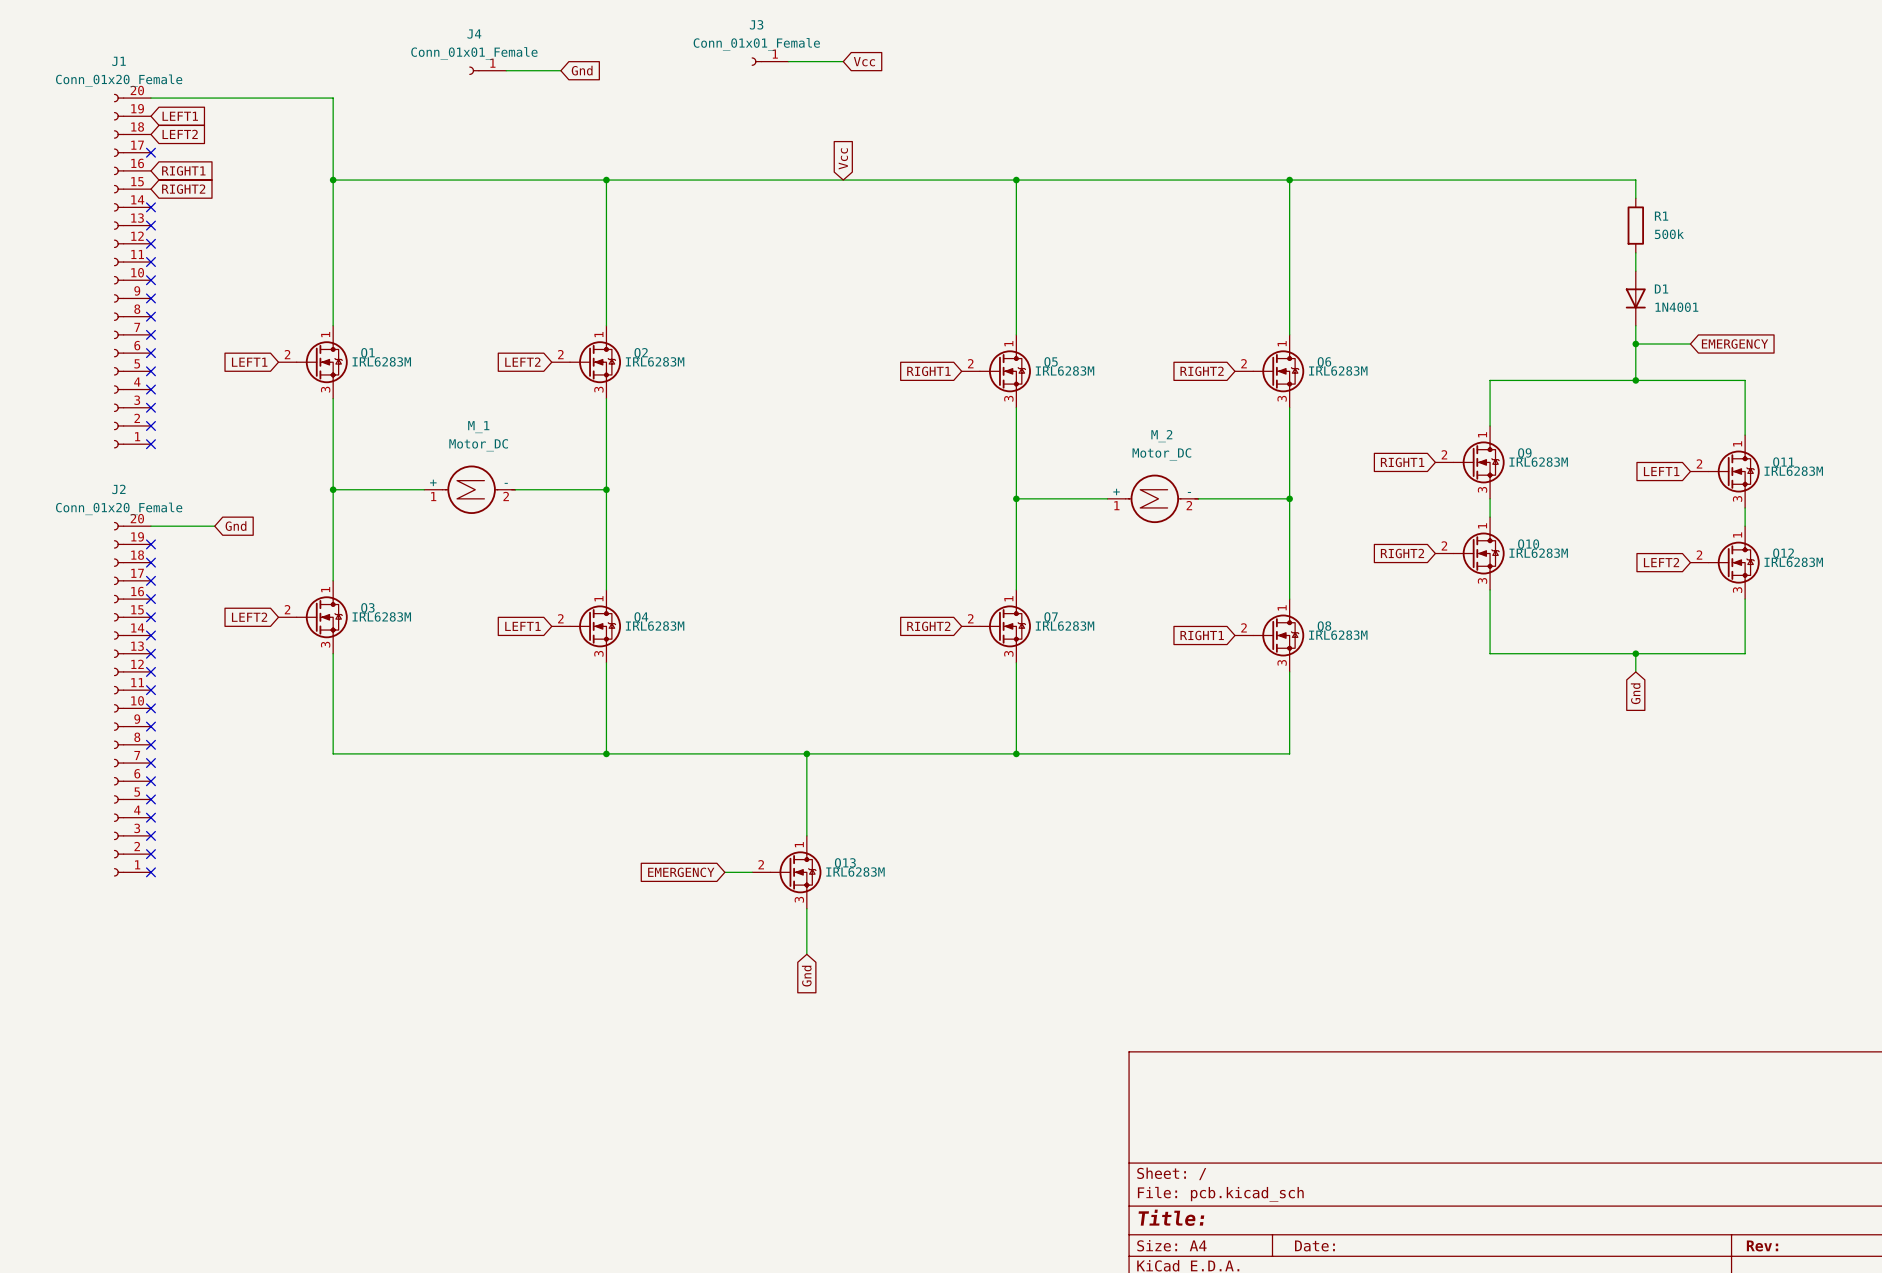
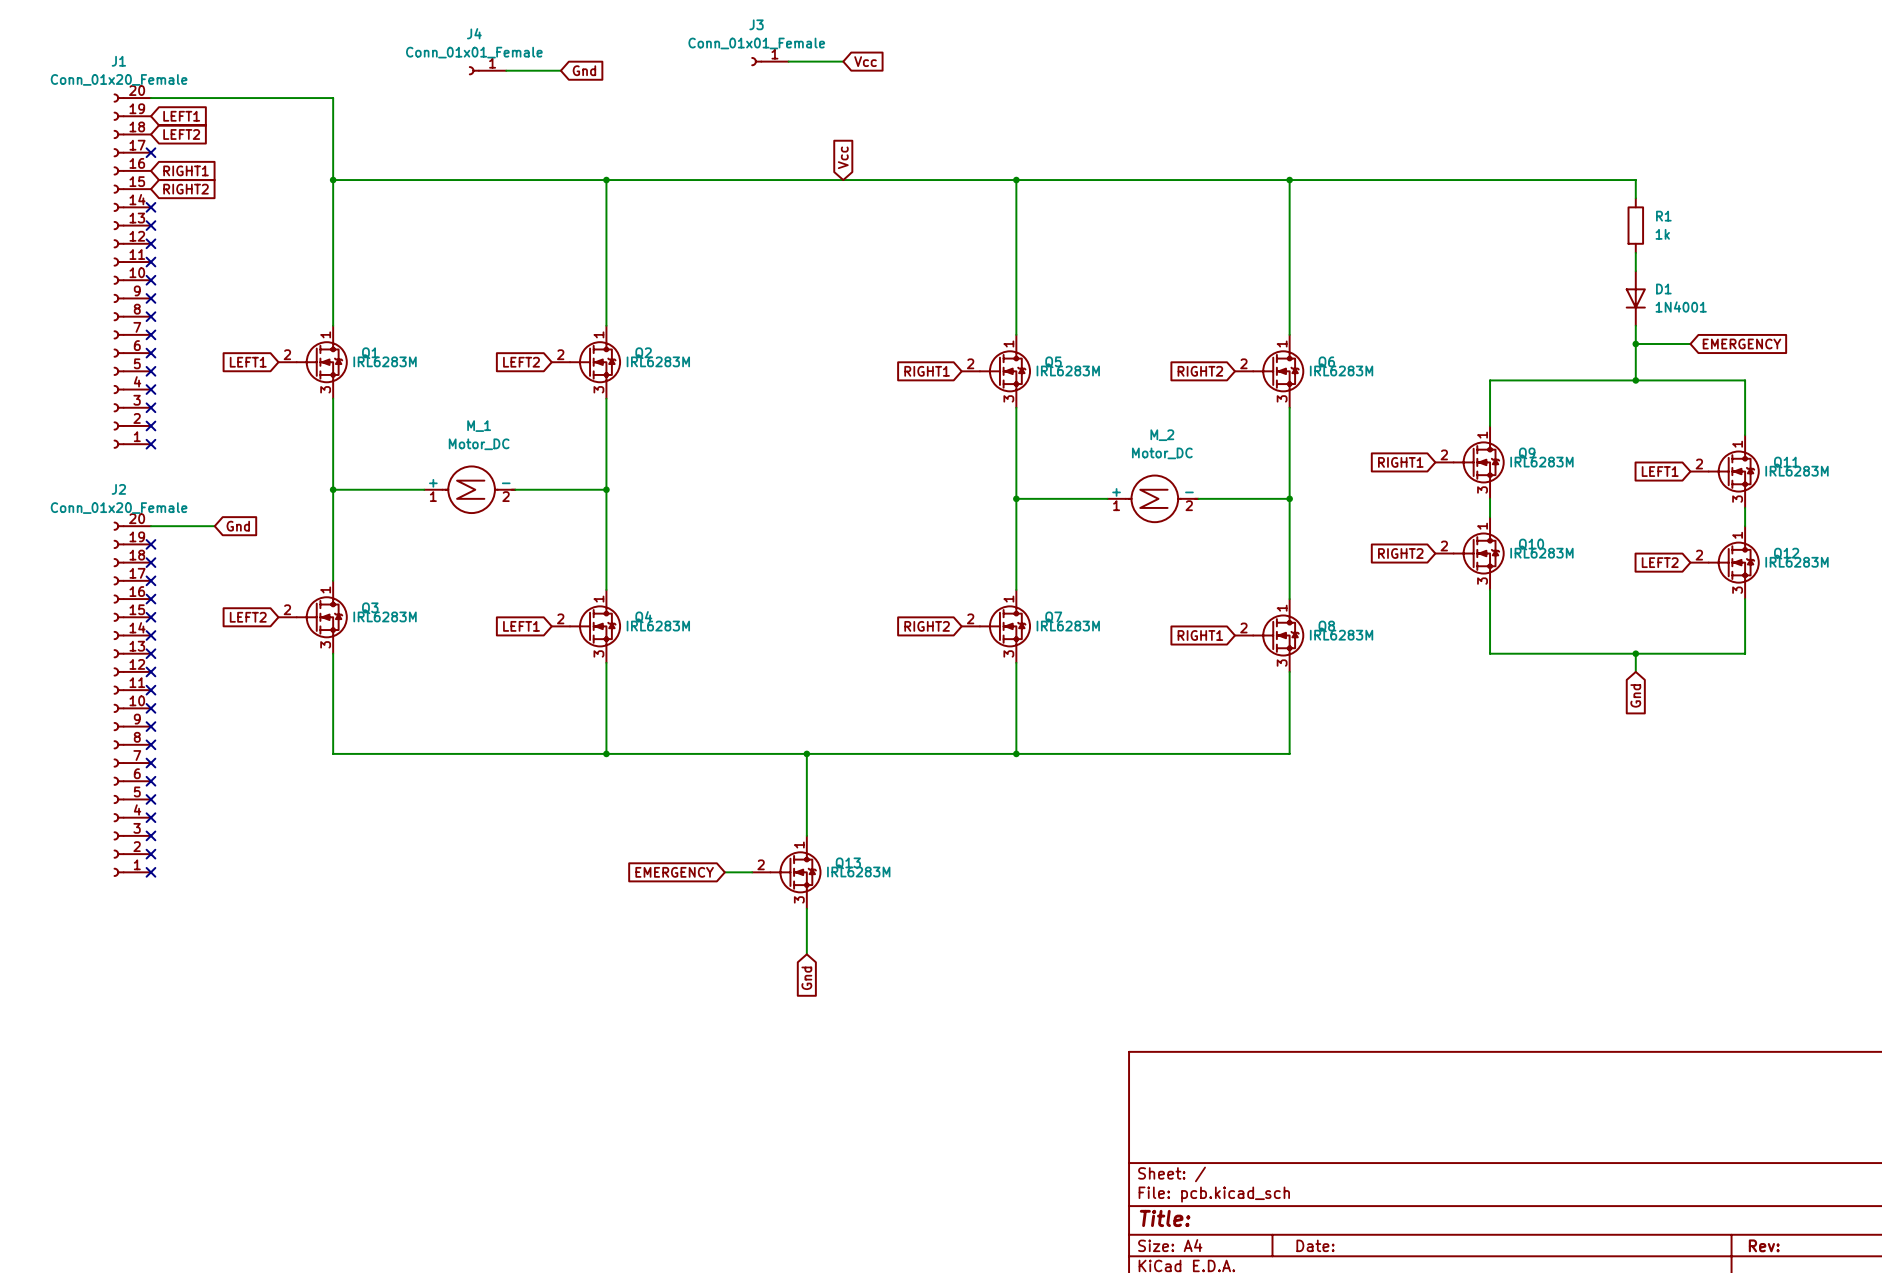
R1 value: 500k (1669, 234) -> 1k (1662, 234)

